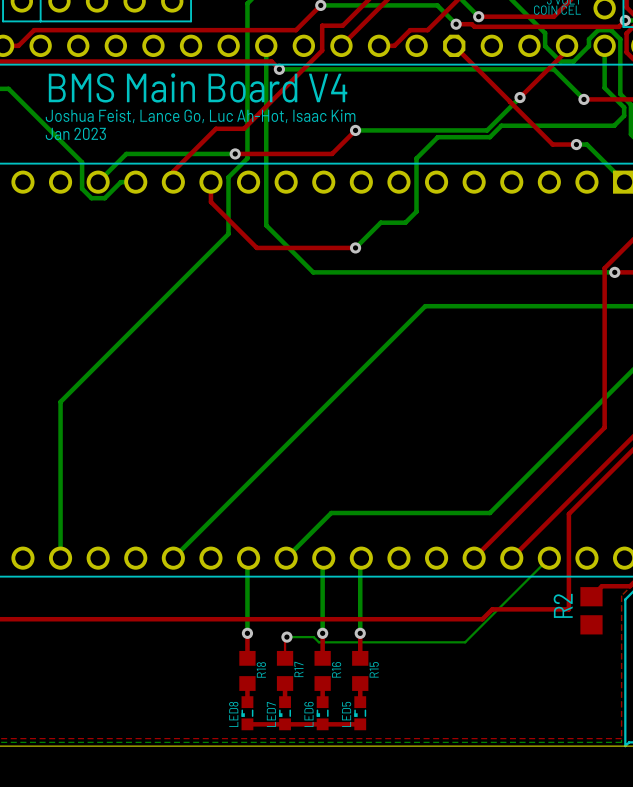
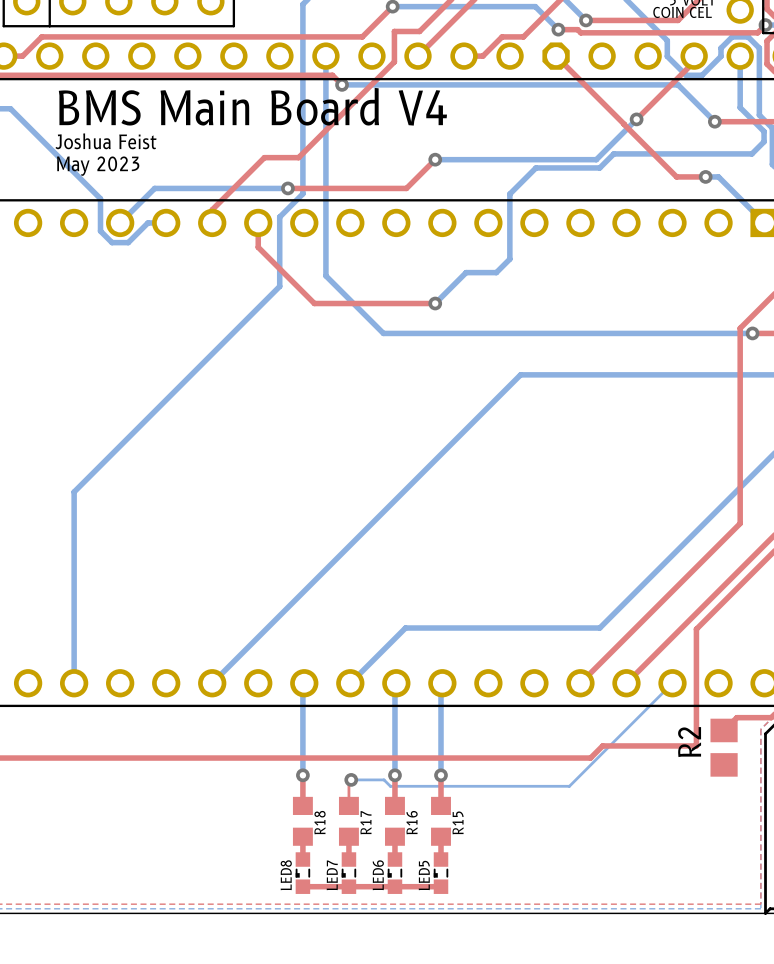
text: Joshua Feist, Lance Go, Luc Ah-Hot, Isaac Kim (200, 116) -> Joshua Feist (105, 141)
text: Jan 2023 (75, 133) -> May 2023 (98, 166)

